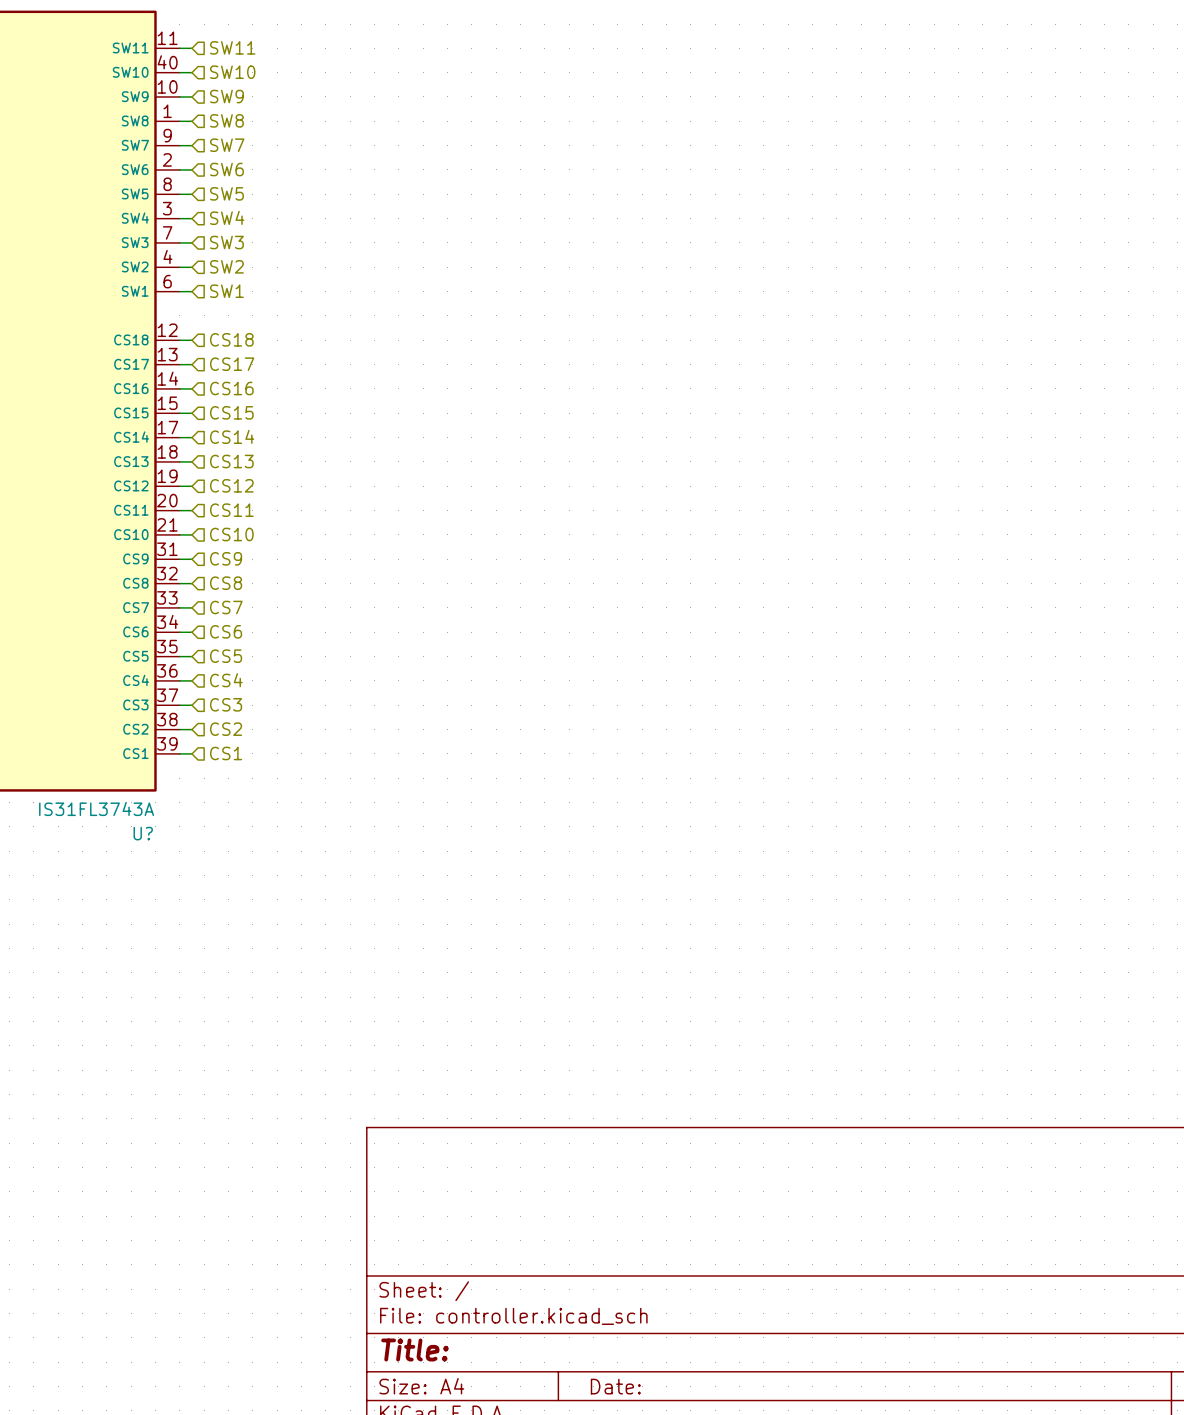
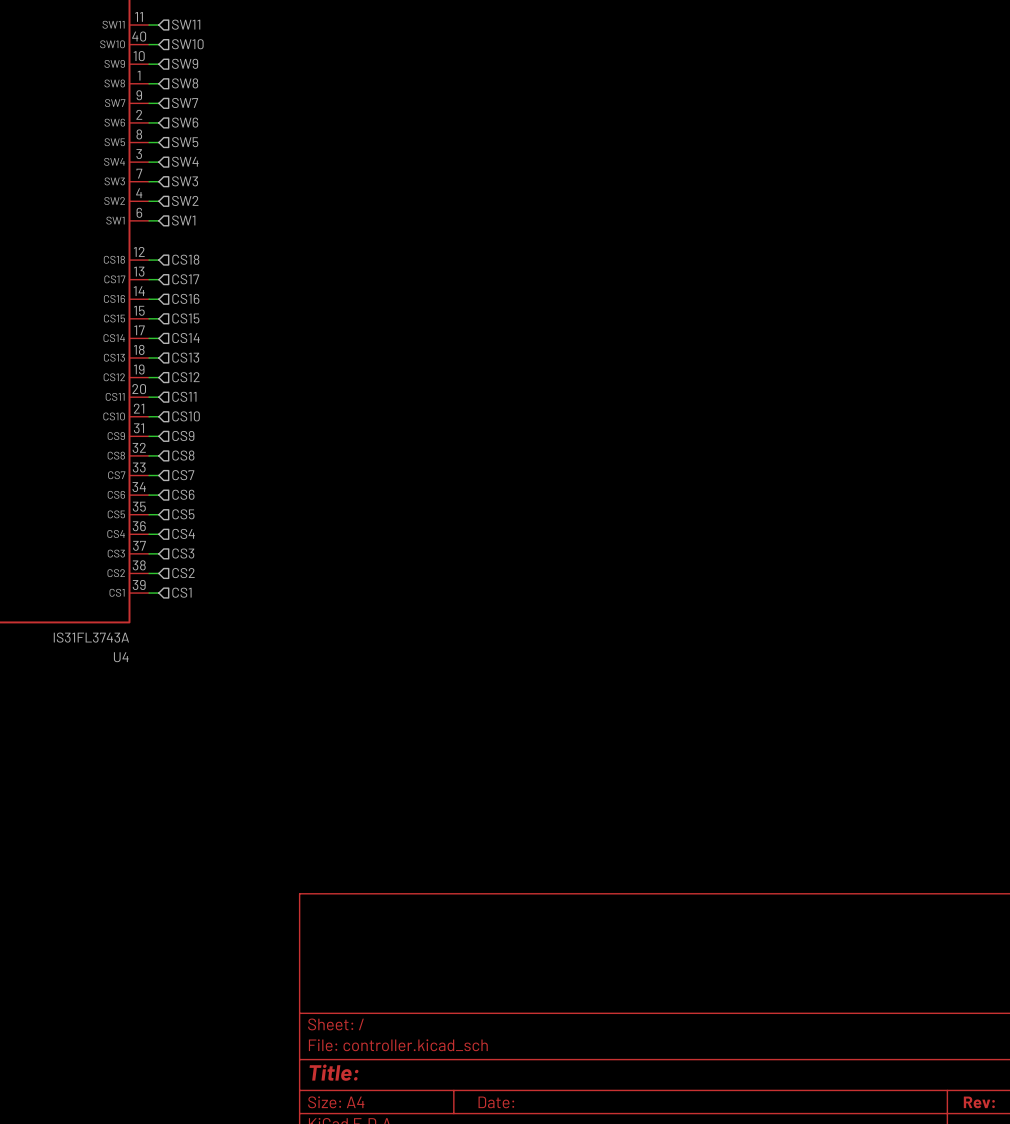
U? name: U? (143, 833) -> U4 (121, 657)

